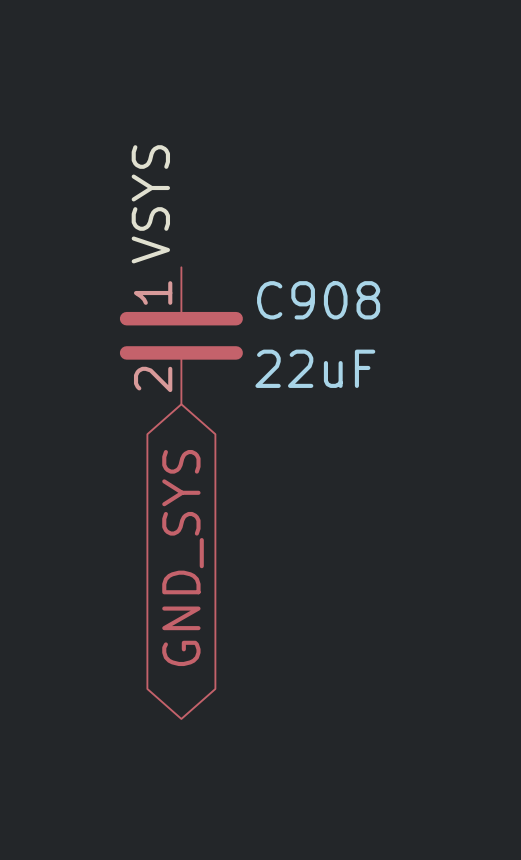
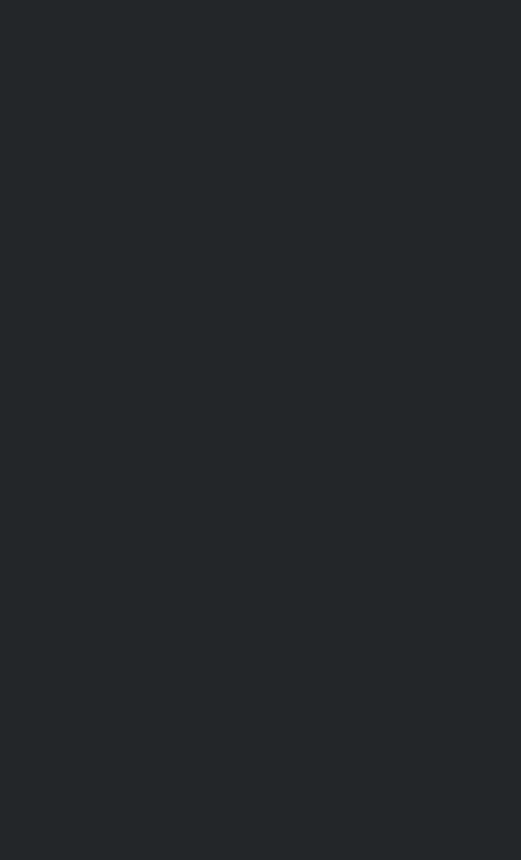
label: VSYS (150, 204) -> none
C908: 22uF (181, 335) -> none
global label: GND_SYS (183, 558) -> none

